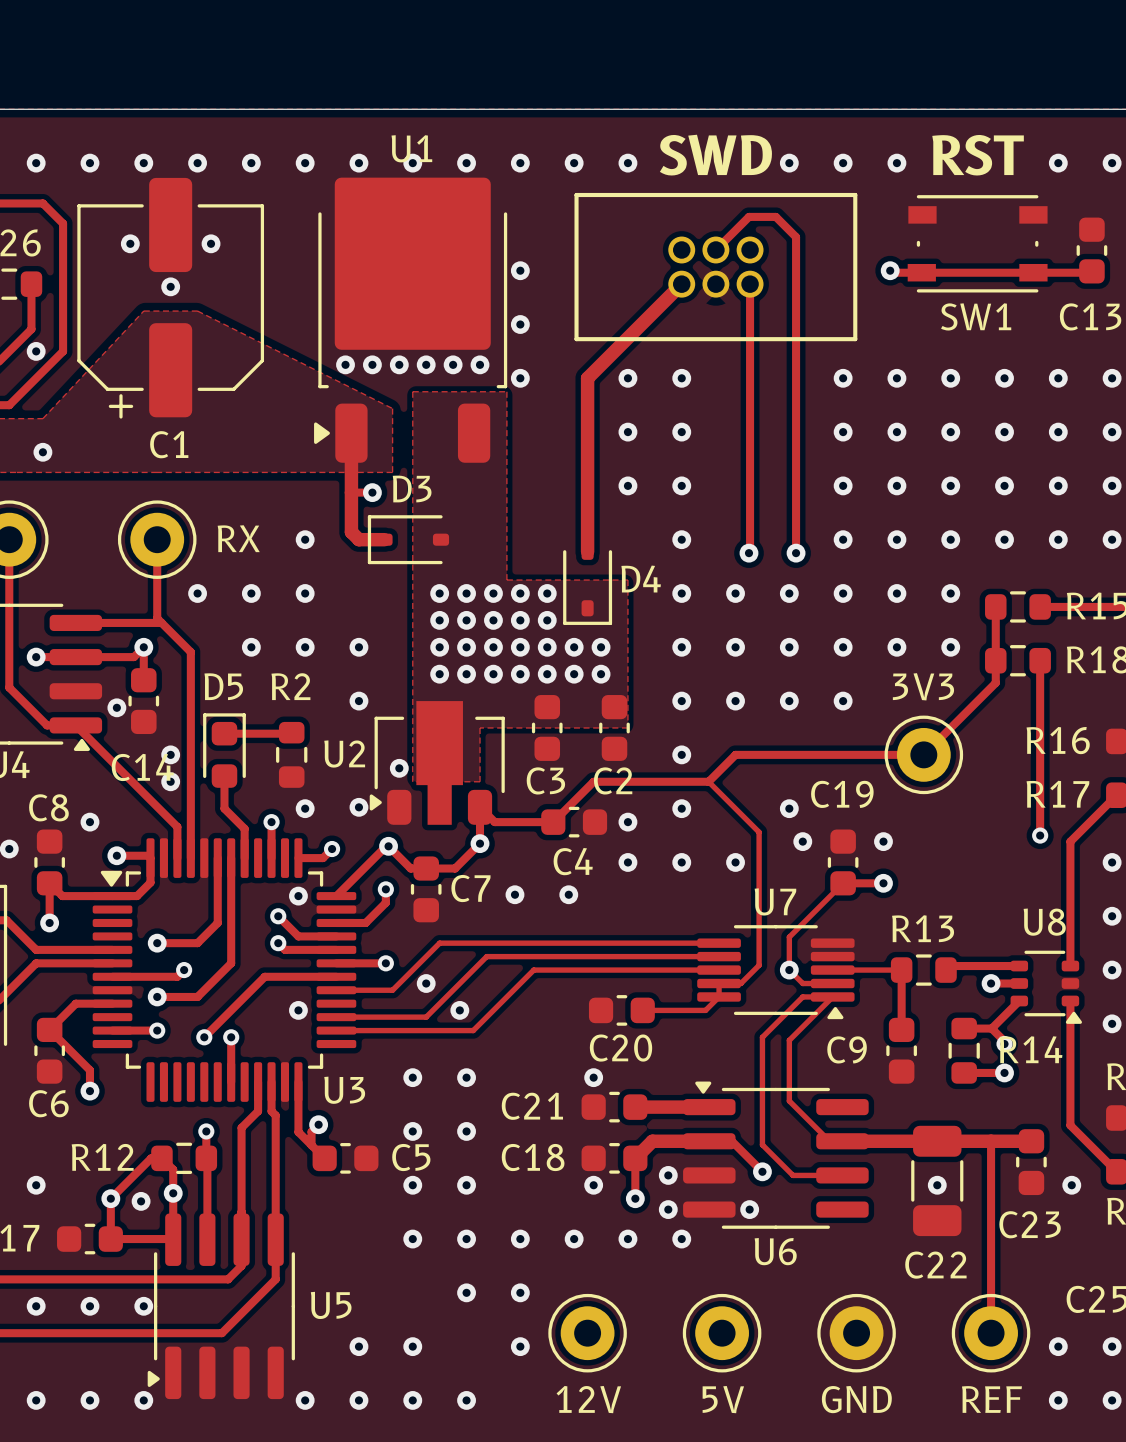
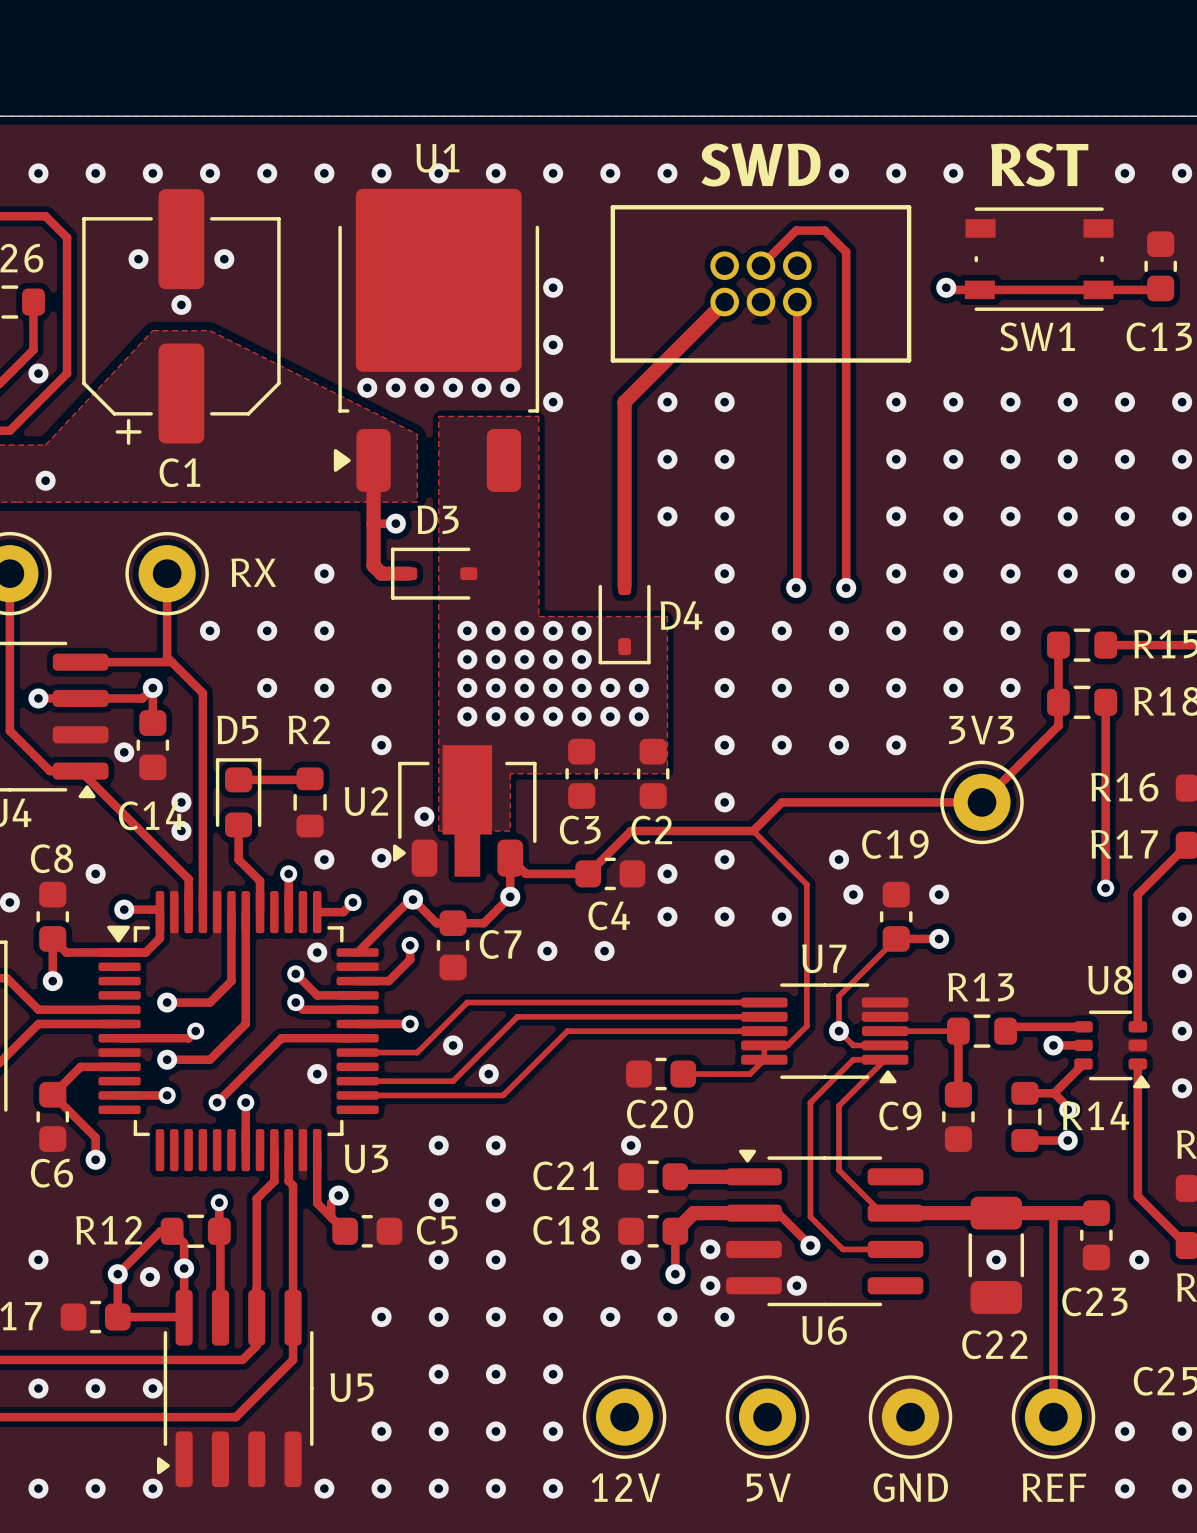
via: none -> (381, 1317)
via: none -> (438, 1374)
via: none -> (495, 1431)
via: none -> (553, 1488)

